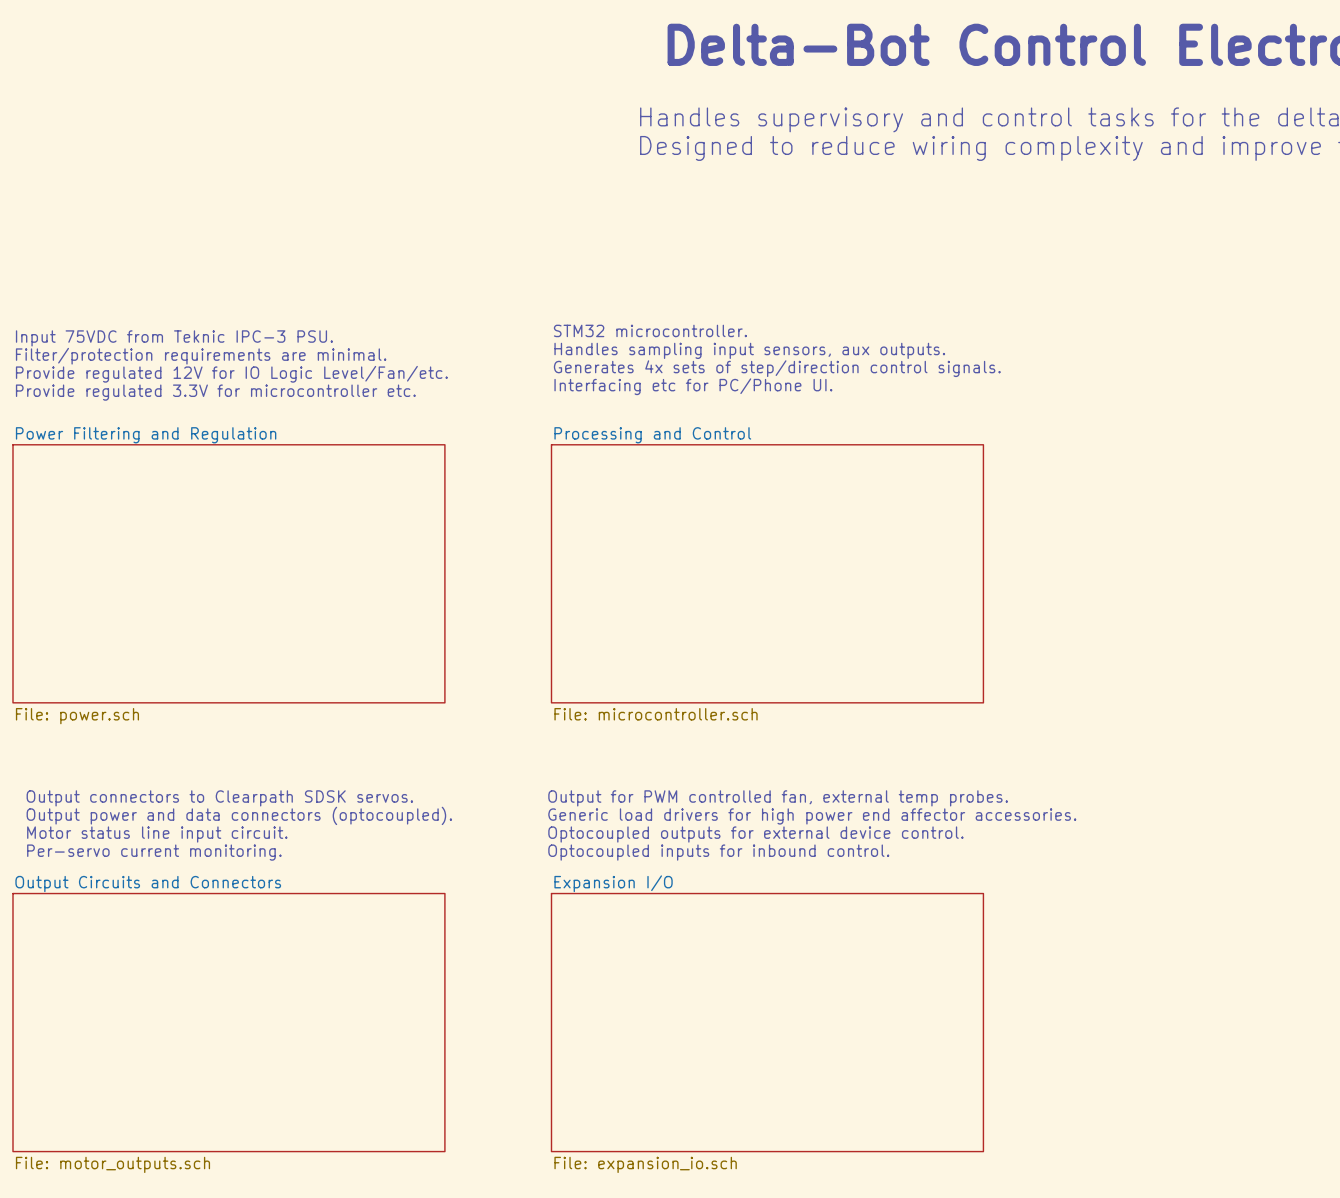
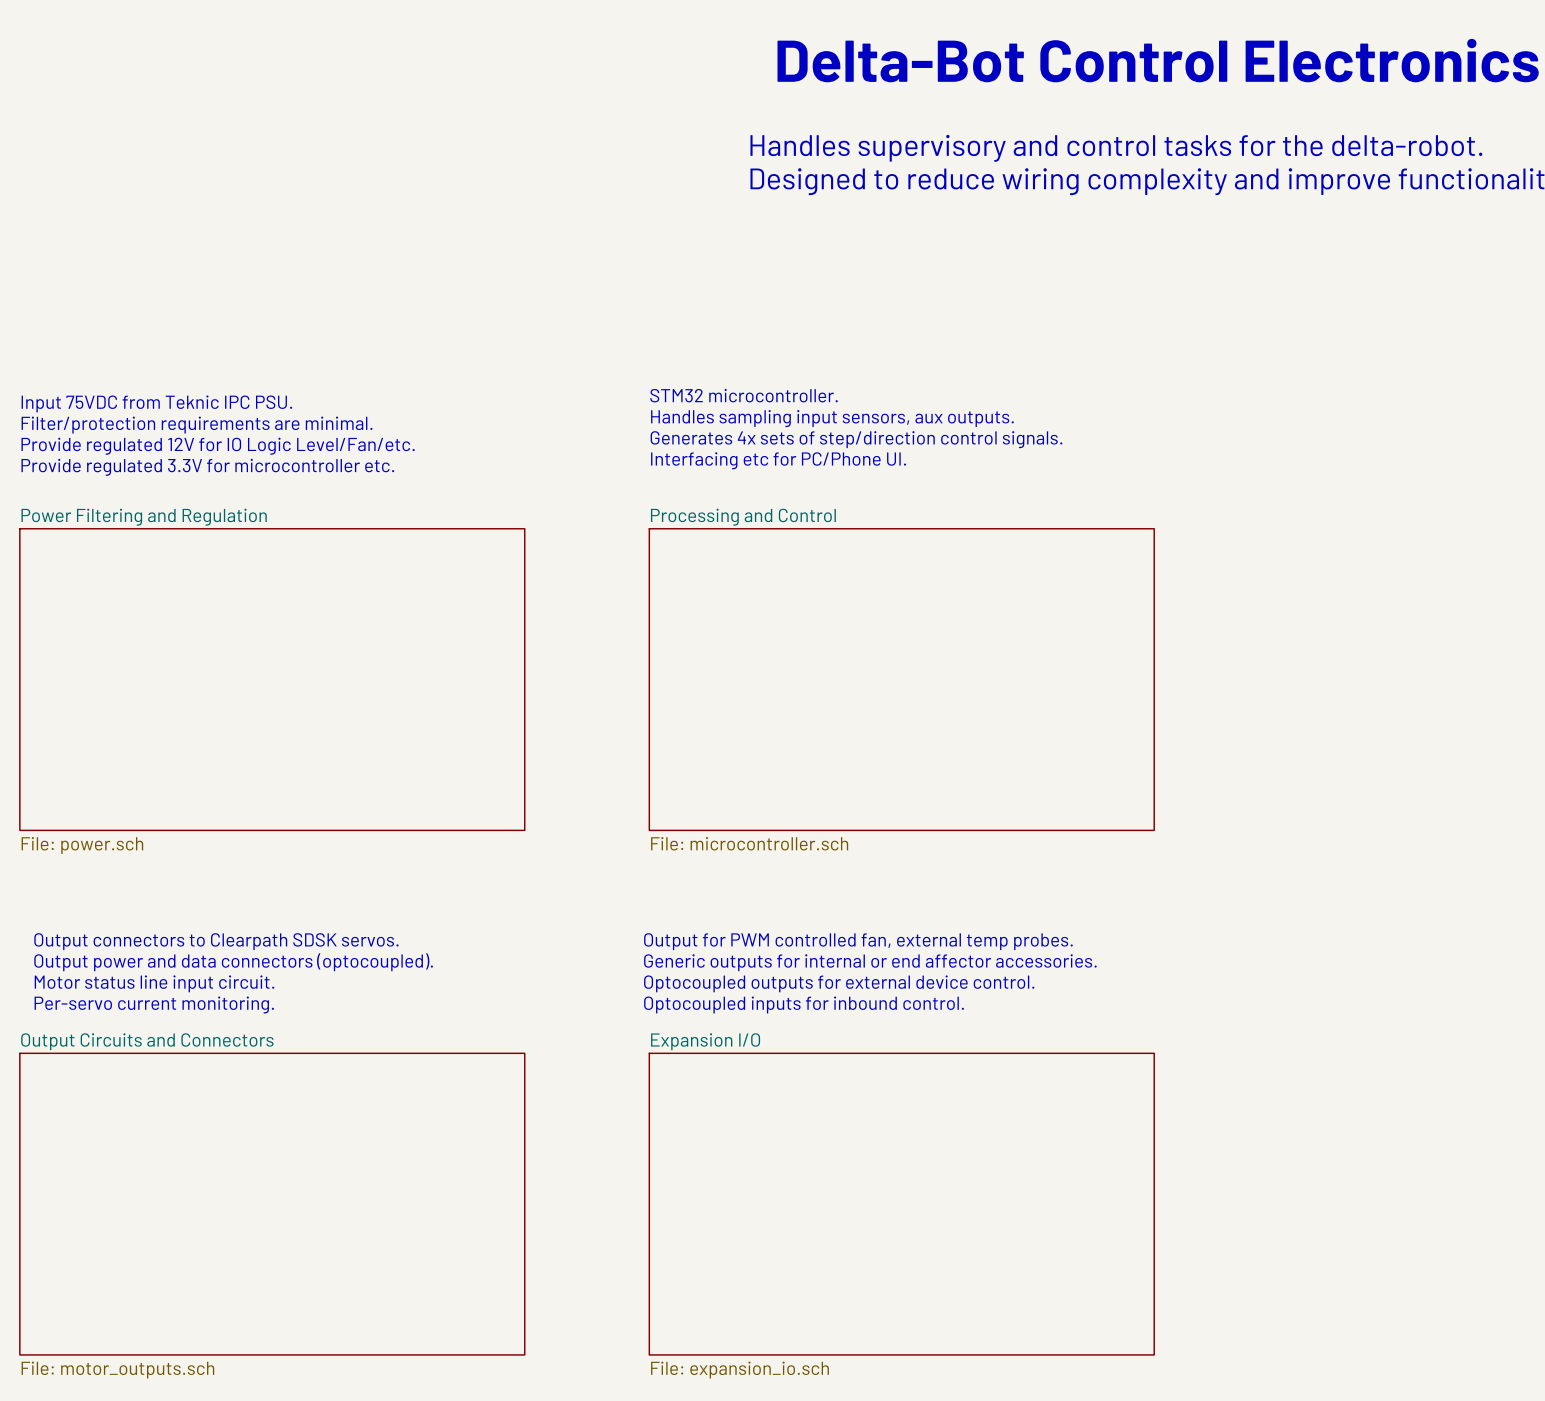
text: Input 75VDC from Teknic IPC-3 PSU. (174, 338) -> Input 75VDC from Teknic IPC PSU. (156, 403)
text: Generic load drivers for high power end affector accessories. (812, 816) -> Generic outputs for internal or end affector accessories. (870, 962)

